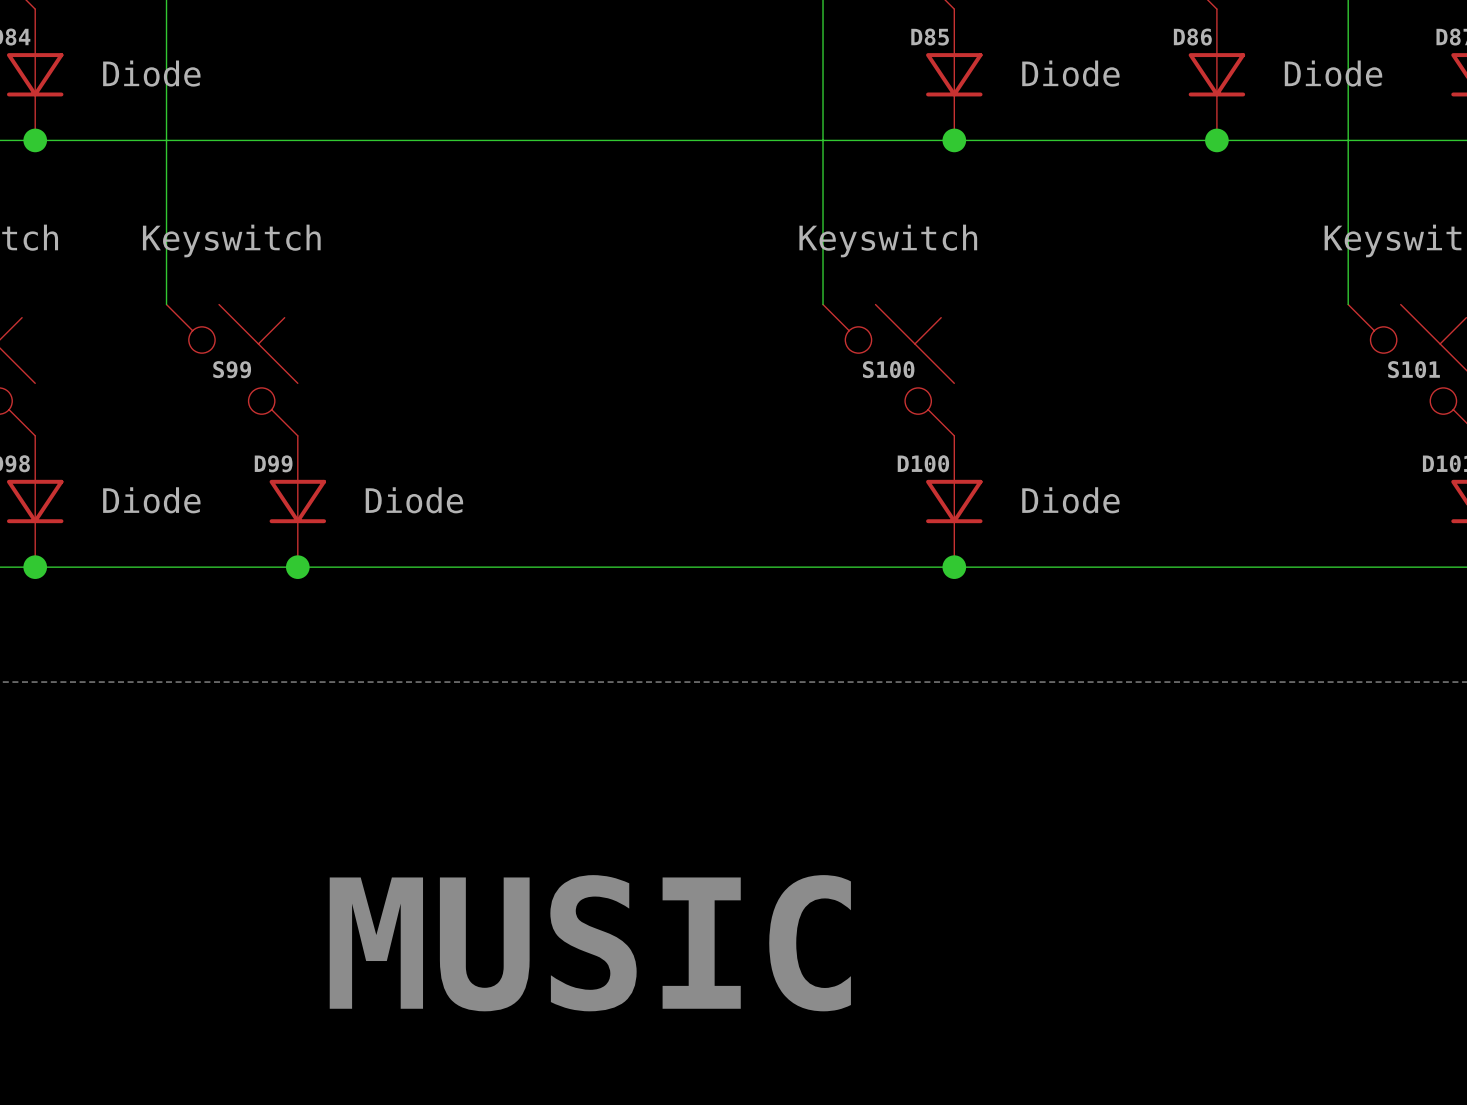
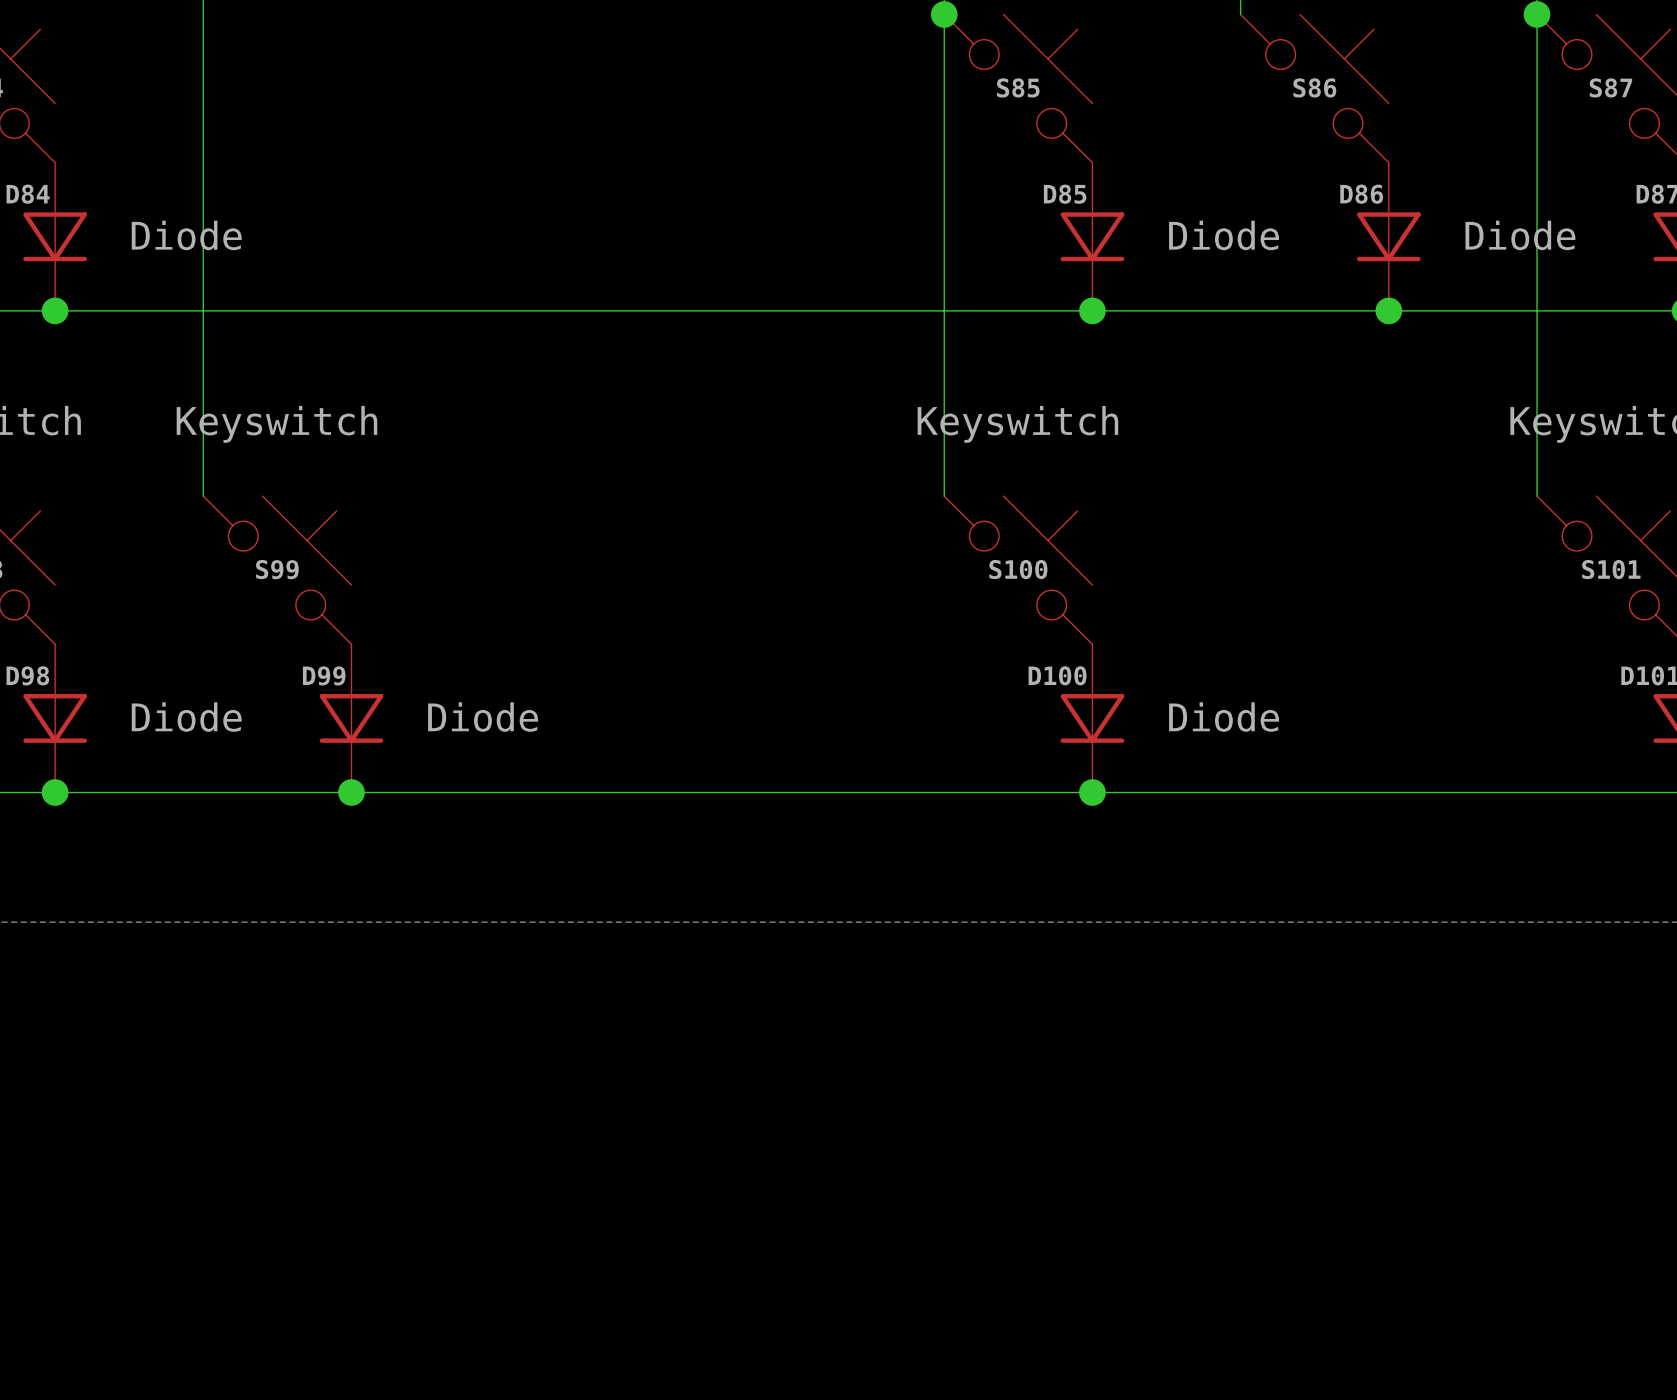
text: MUSIC (590, 943) -> none

